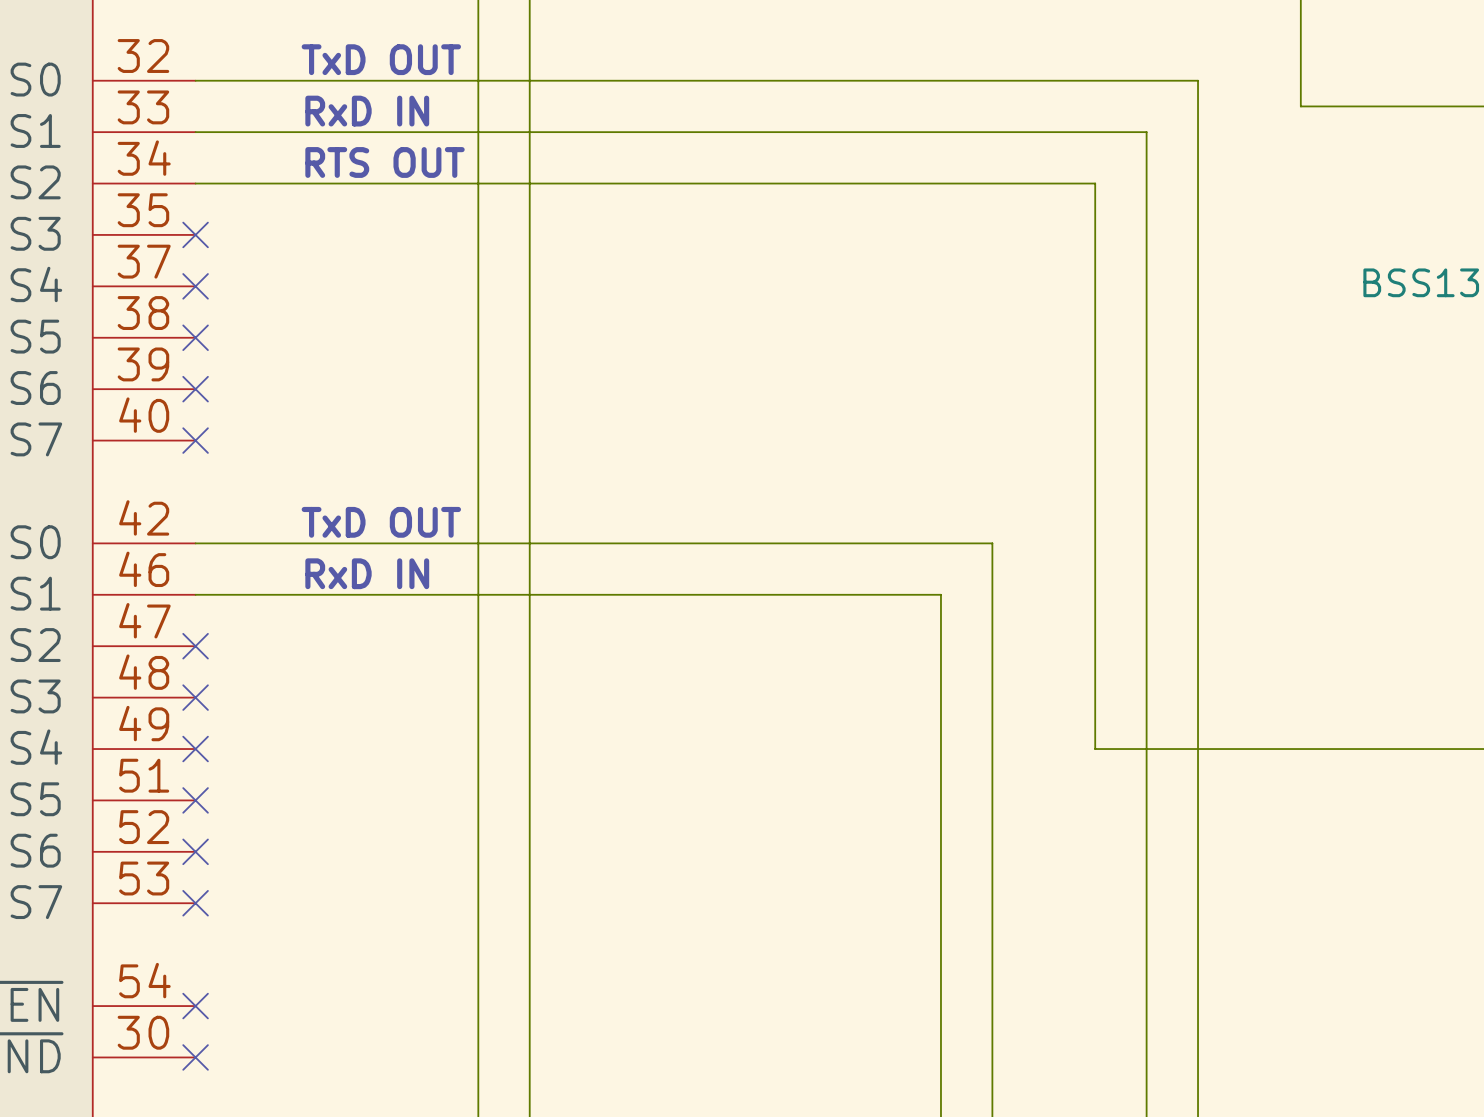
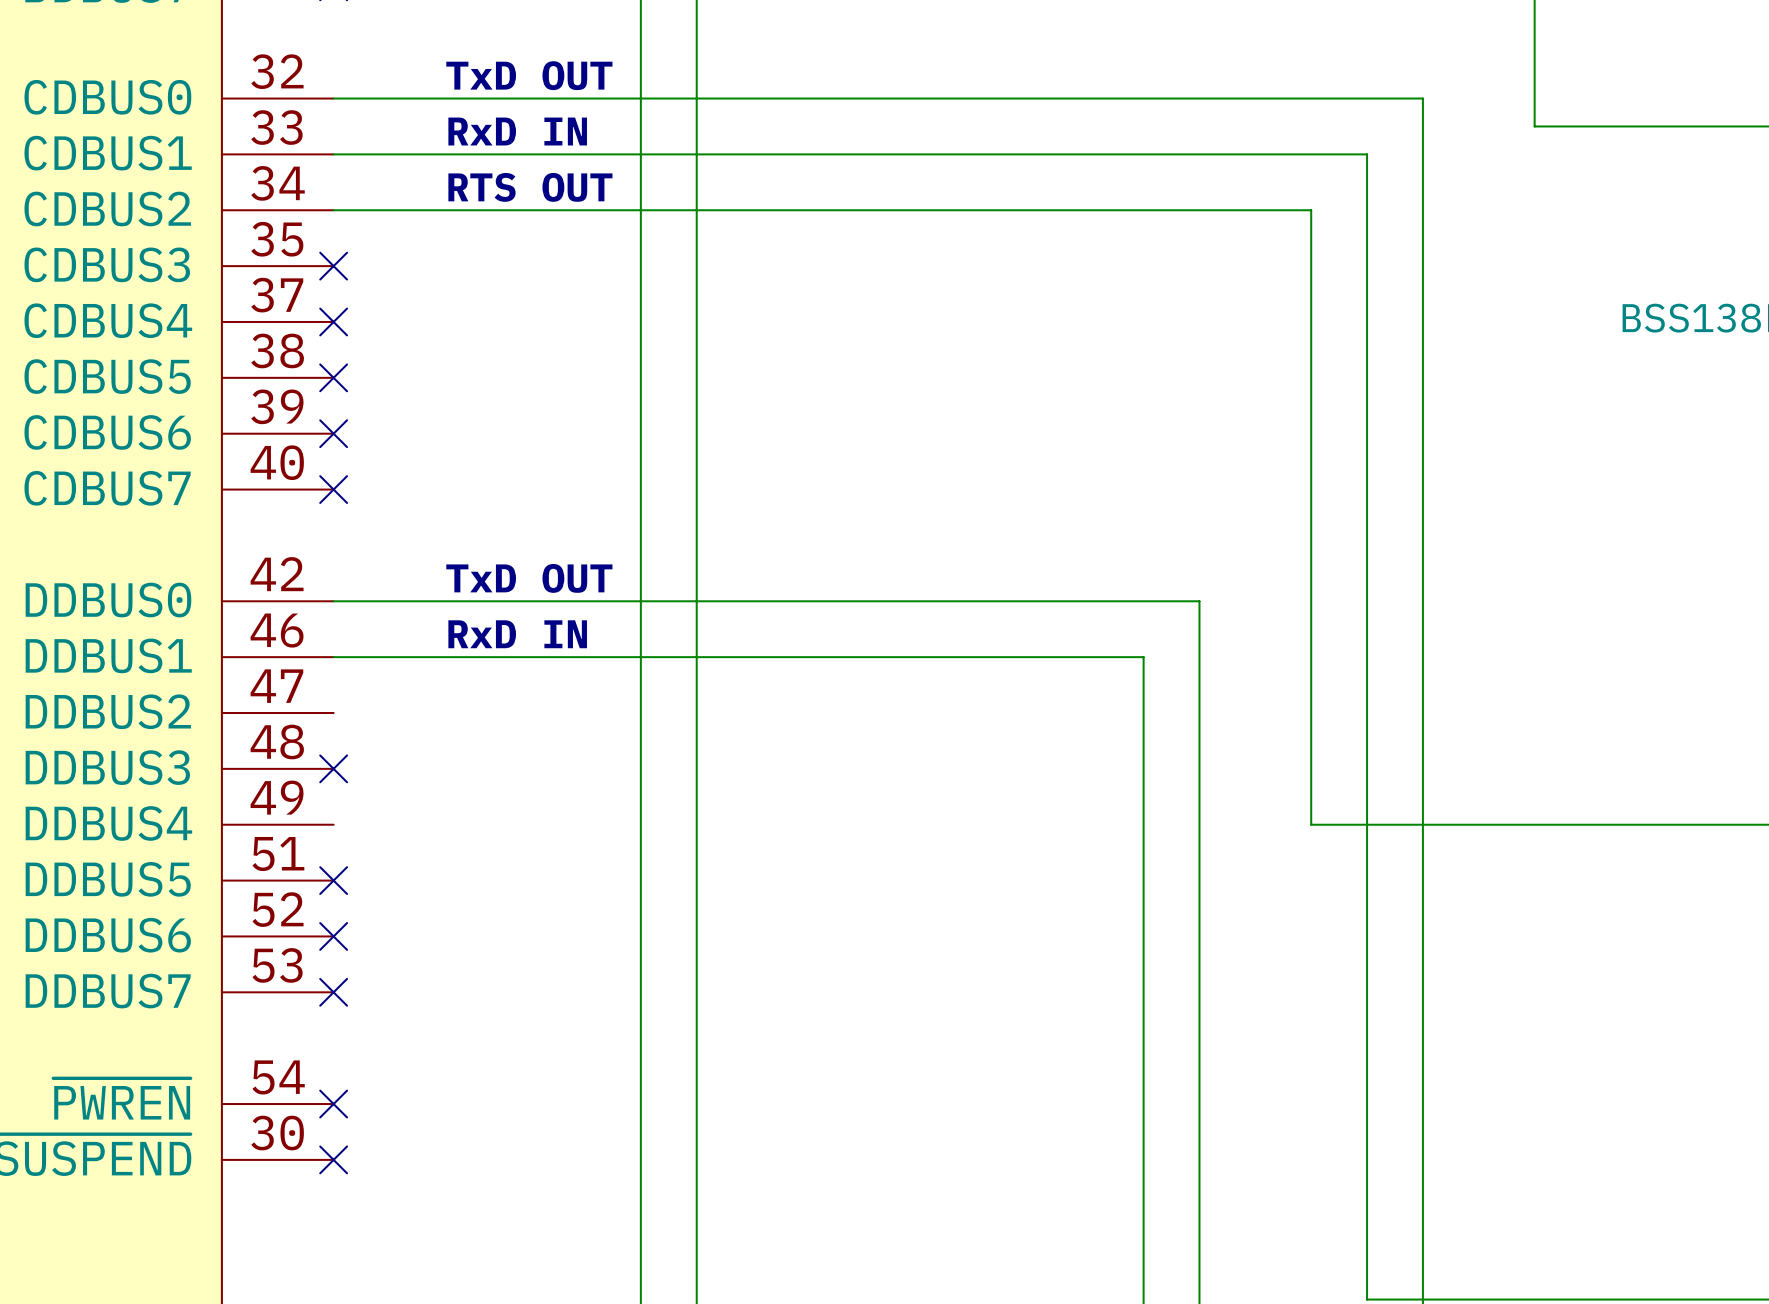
no-connect mark: (195, 646) -> none
no-connect mark: (195, 749) -> none

